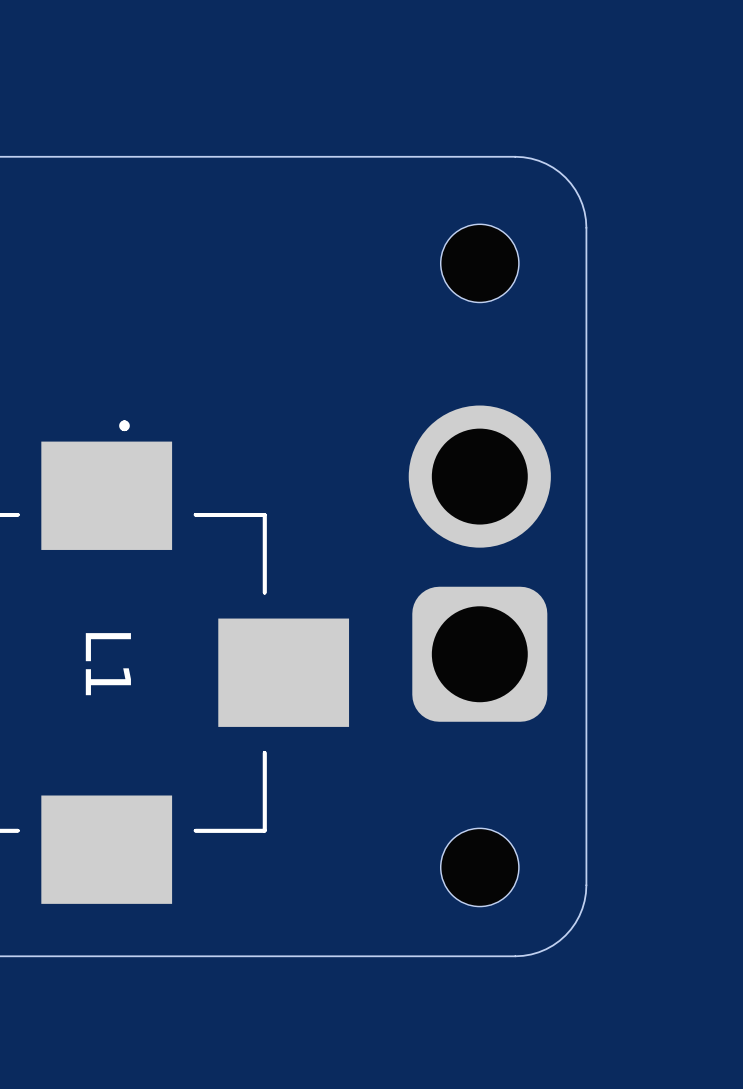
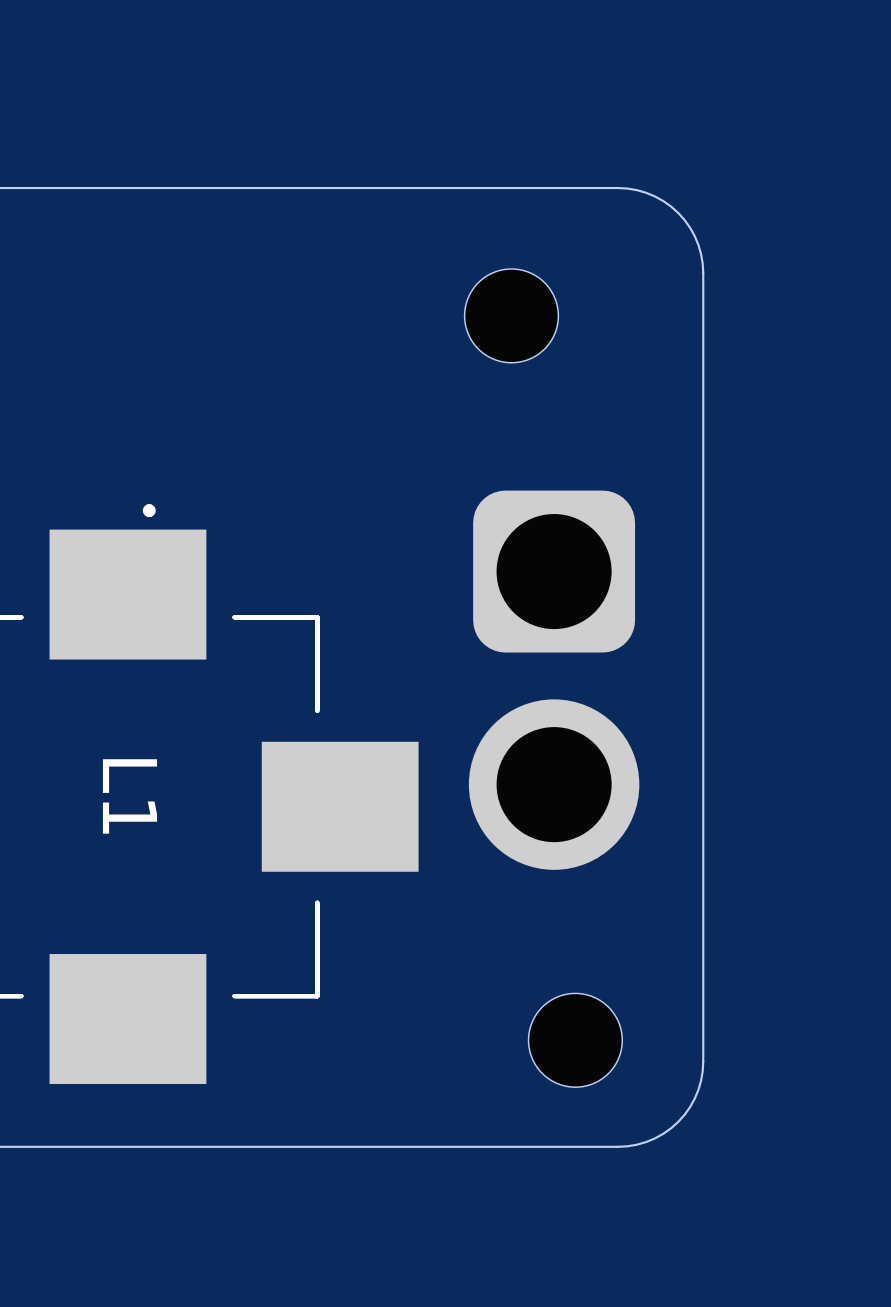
part position: (479, 263) -> (511, 315)
part rotation: 0° (479, 563) -> 180° (554, 680)

